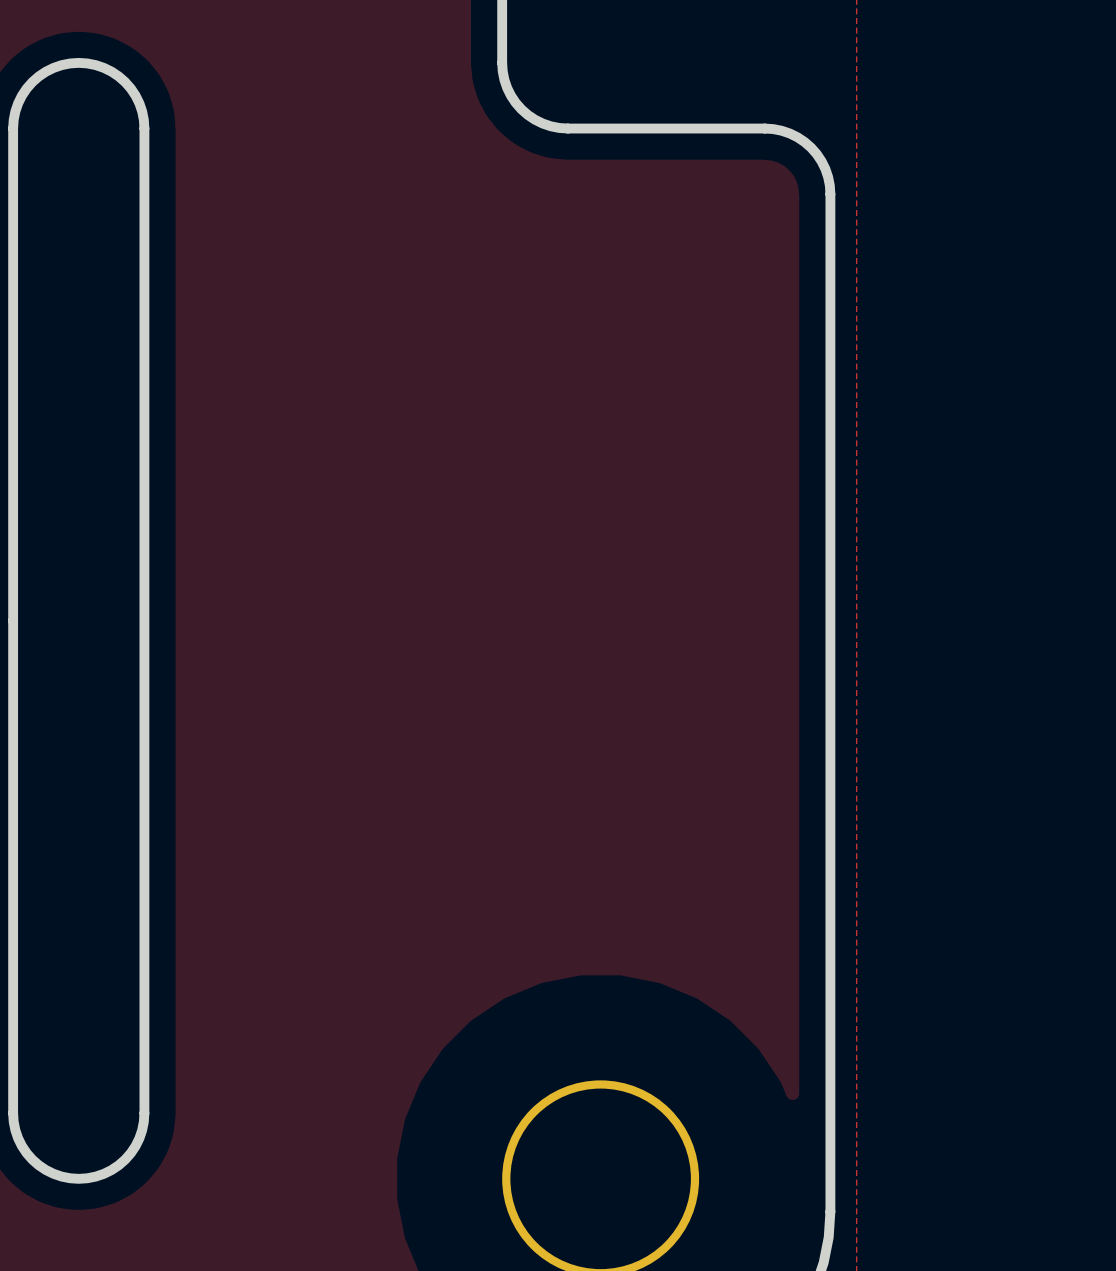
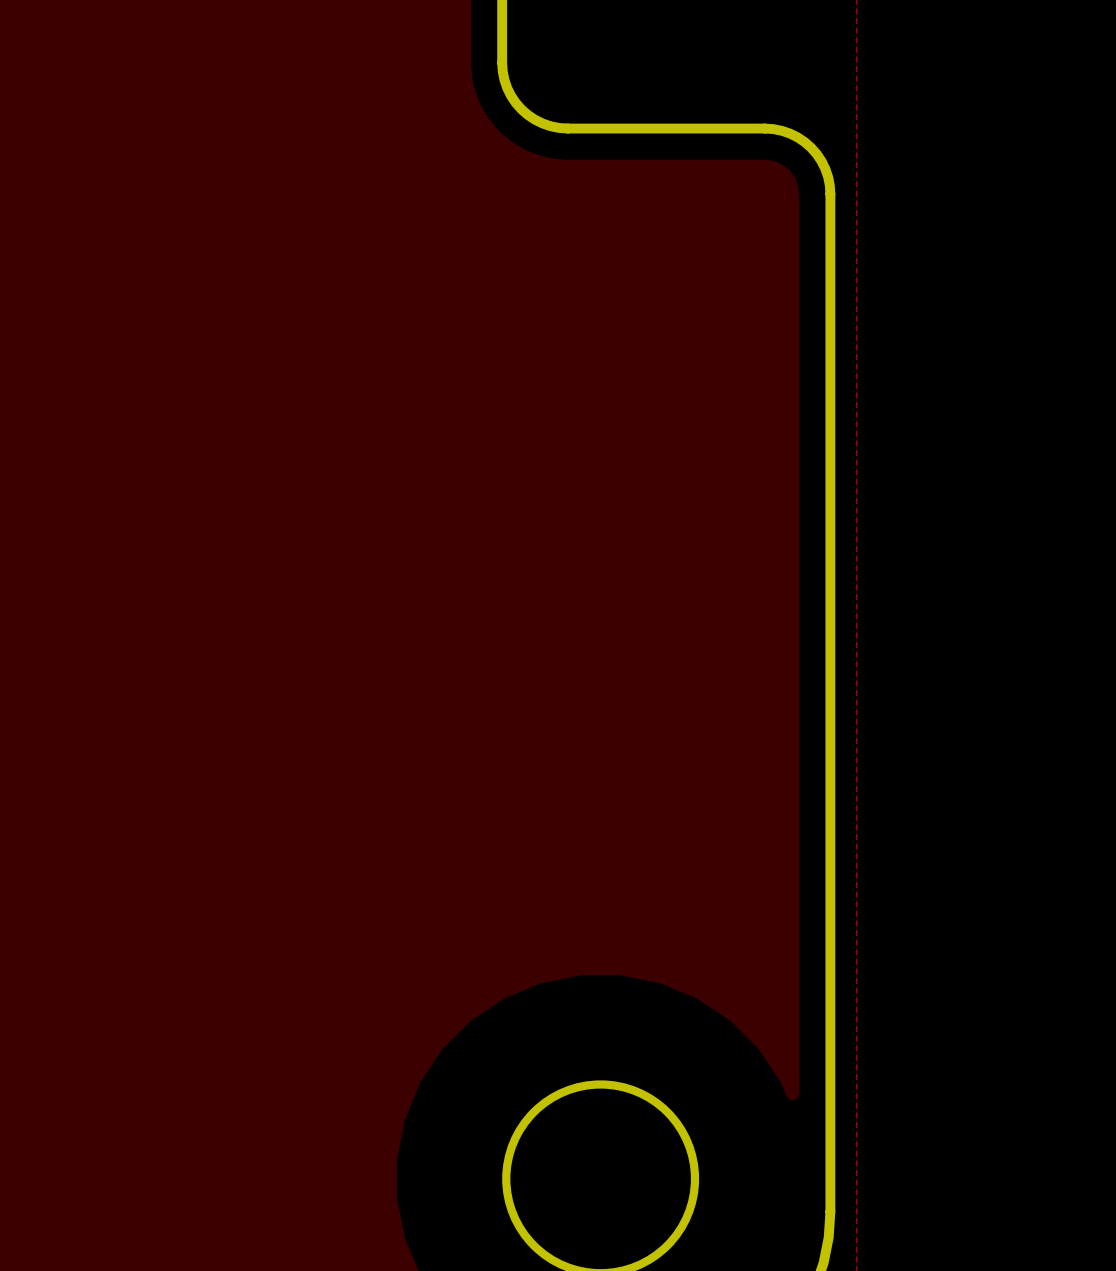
board edge: (144, 128) (143, 1121) (135, 1146) (118, 1165) (95, 1176) (70, 1178) (53, 1173) (32, 1159) (18, 1138) (13, 1113) (13, 119) (18, 103) (32, 82) (53, 67) (78, 62) (103, 67) (125, 82) (139, 103) (144, 128) -> none

